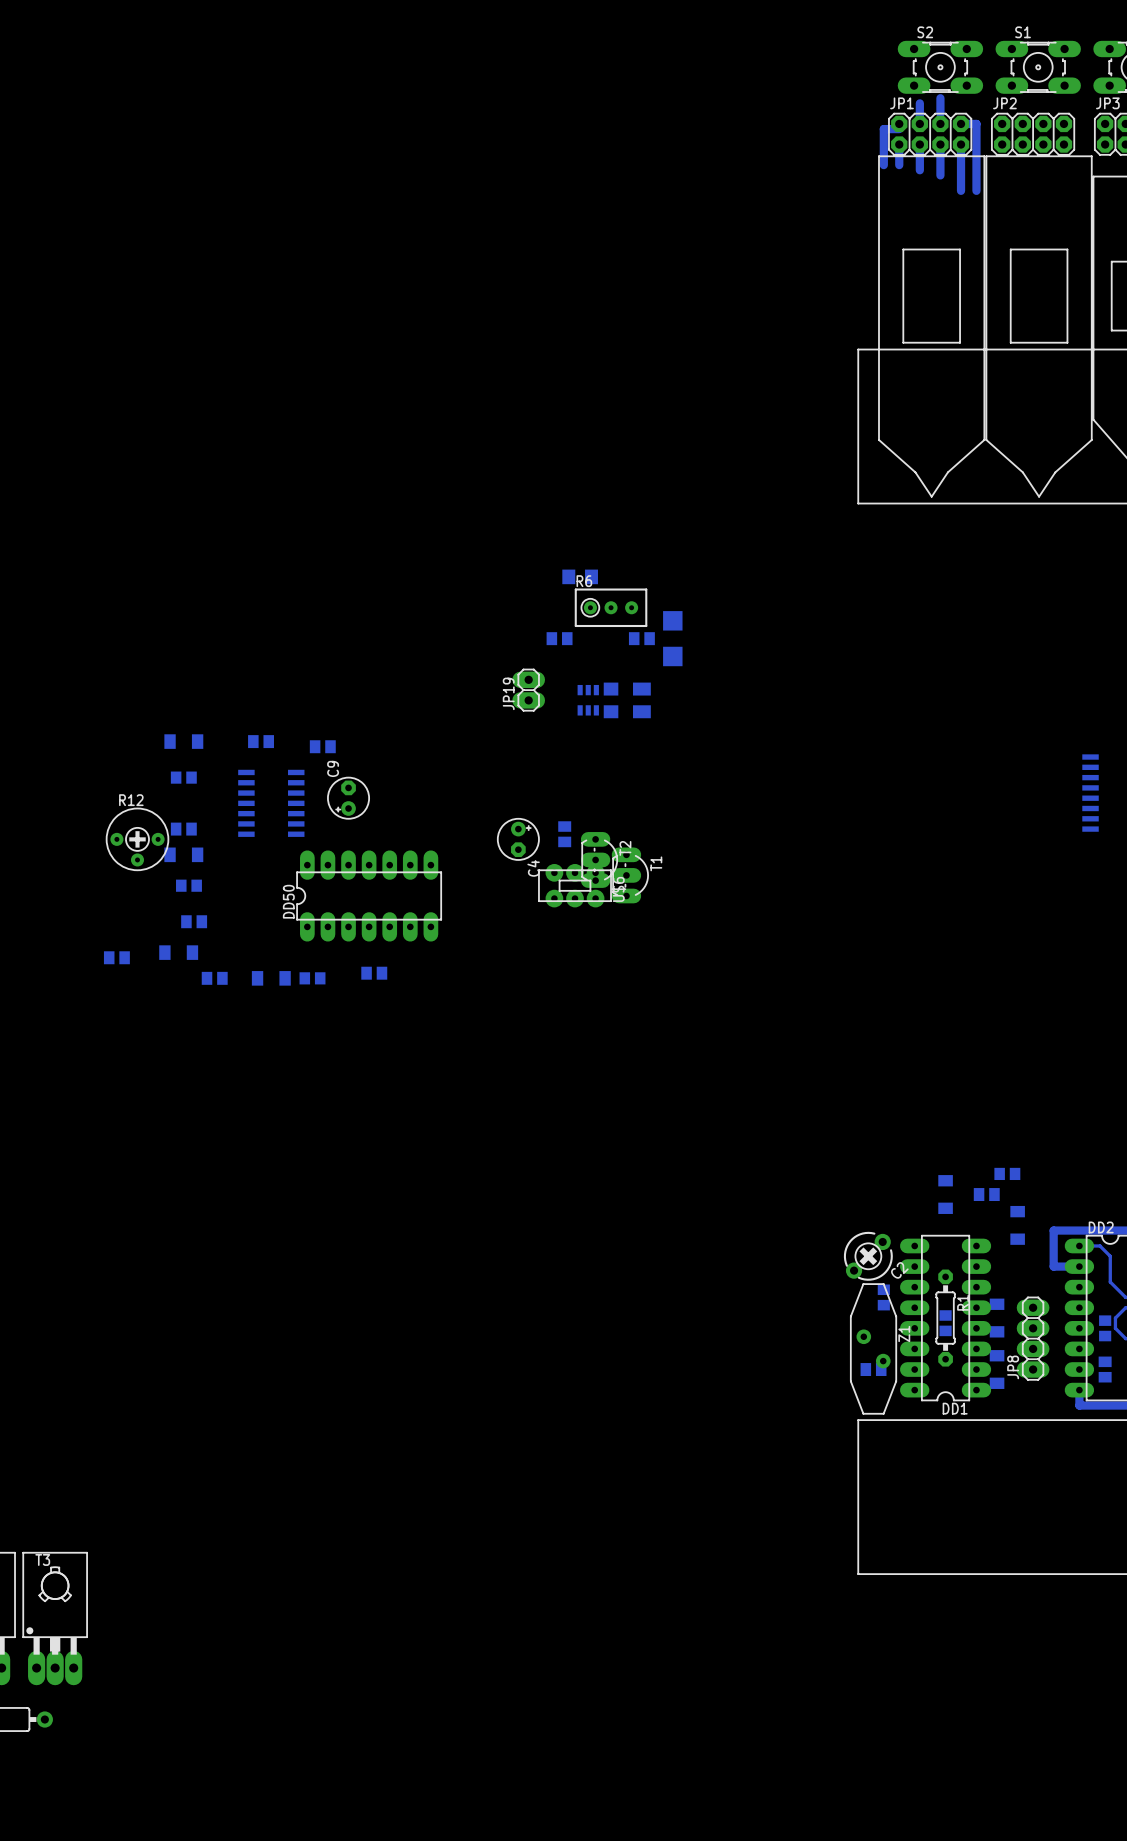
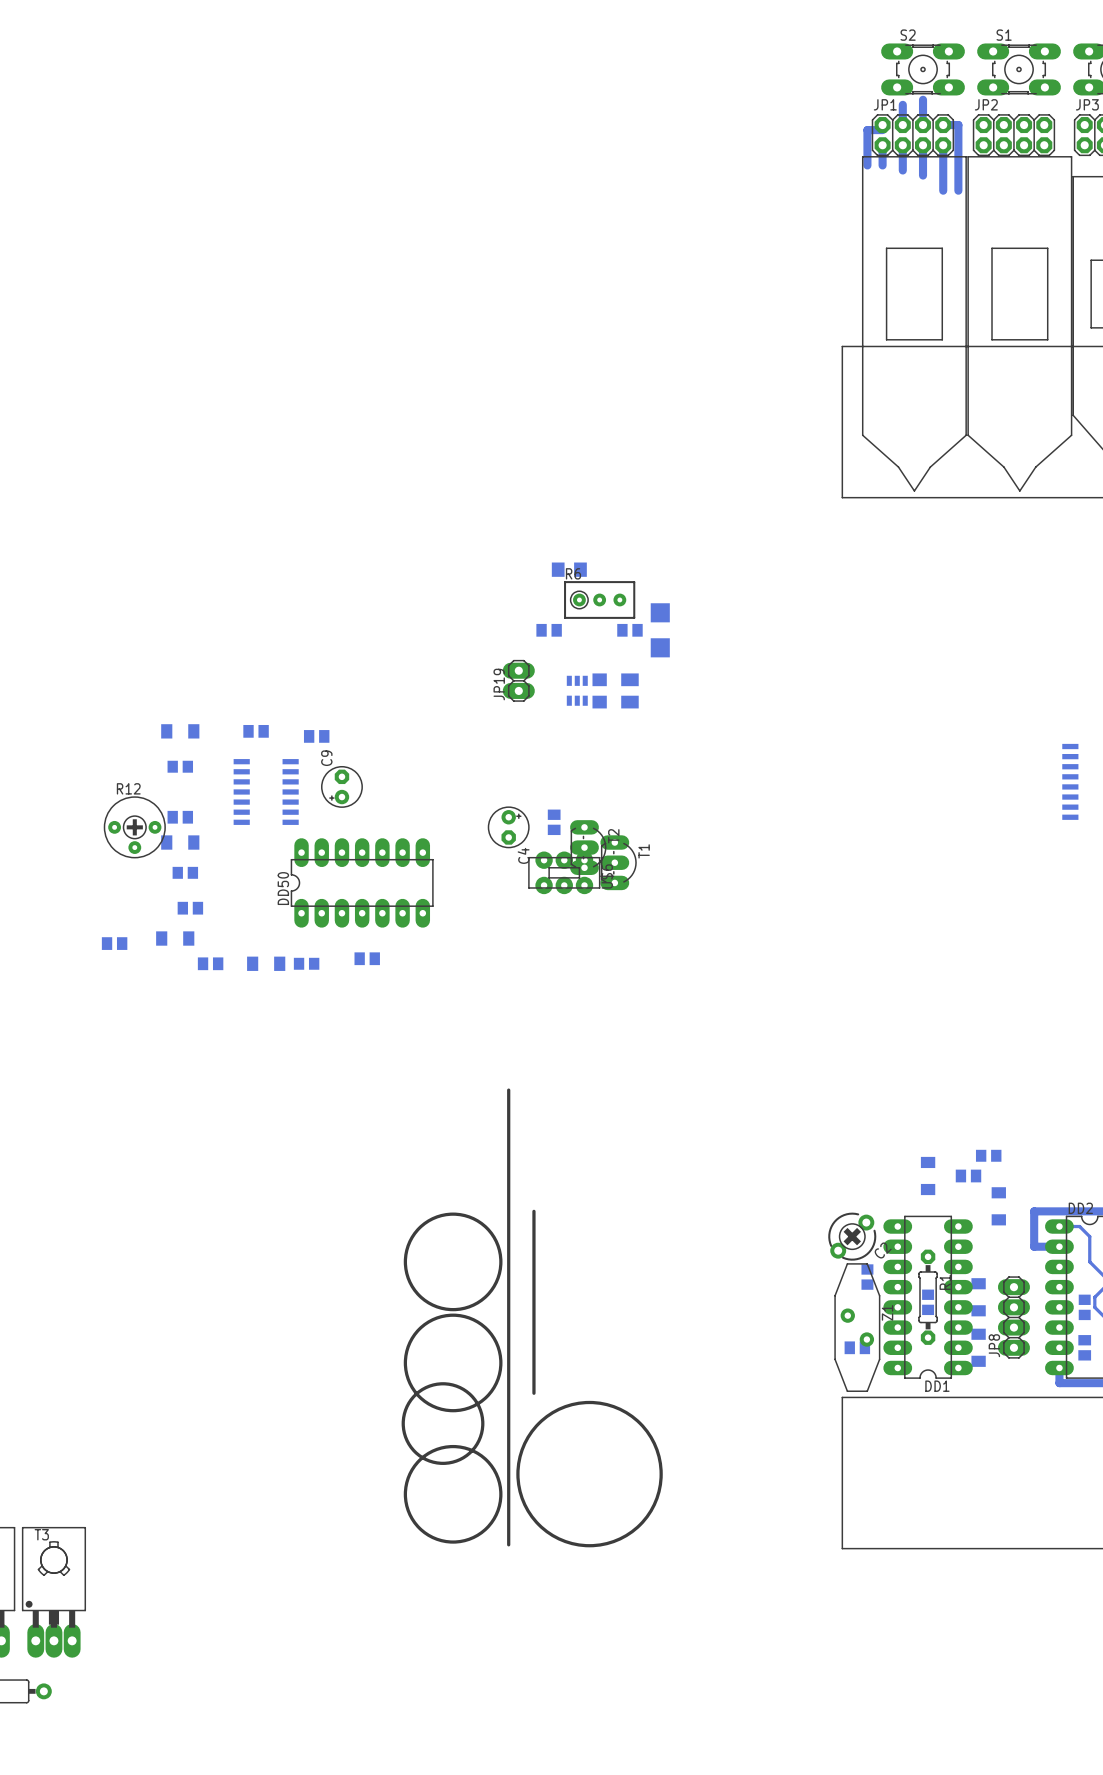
line: none -> (508, 1090) (508, 1544)
line: none -> (533, 1211) (533, 1393)
drawing: none -> [401, 1212, 503, 1544]
drawing: none -> [516, 1400, 663, 1548]

